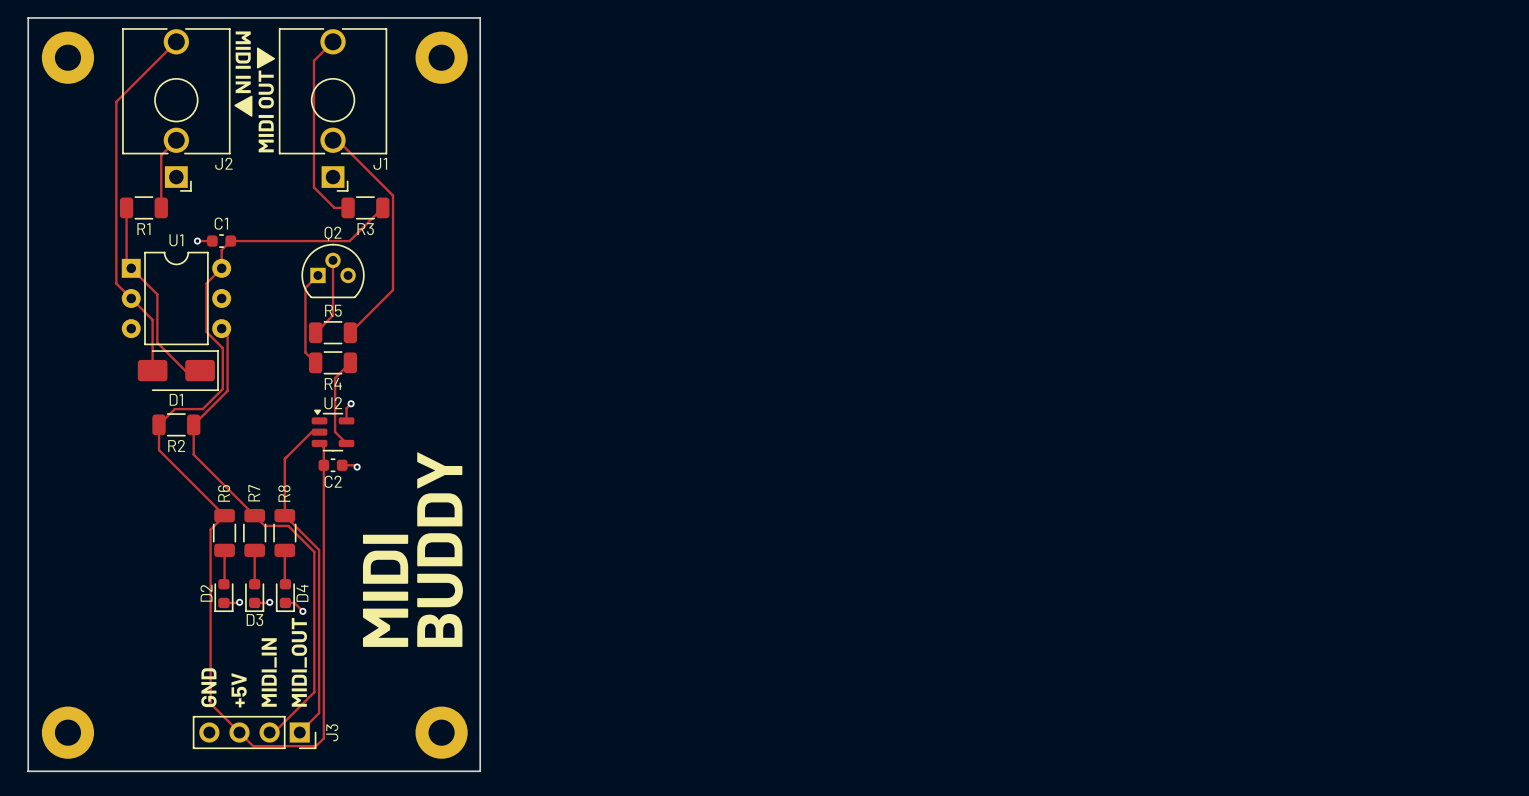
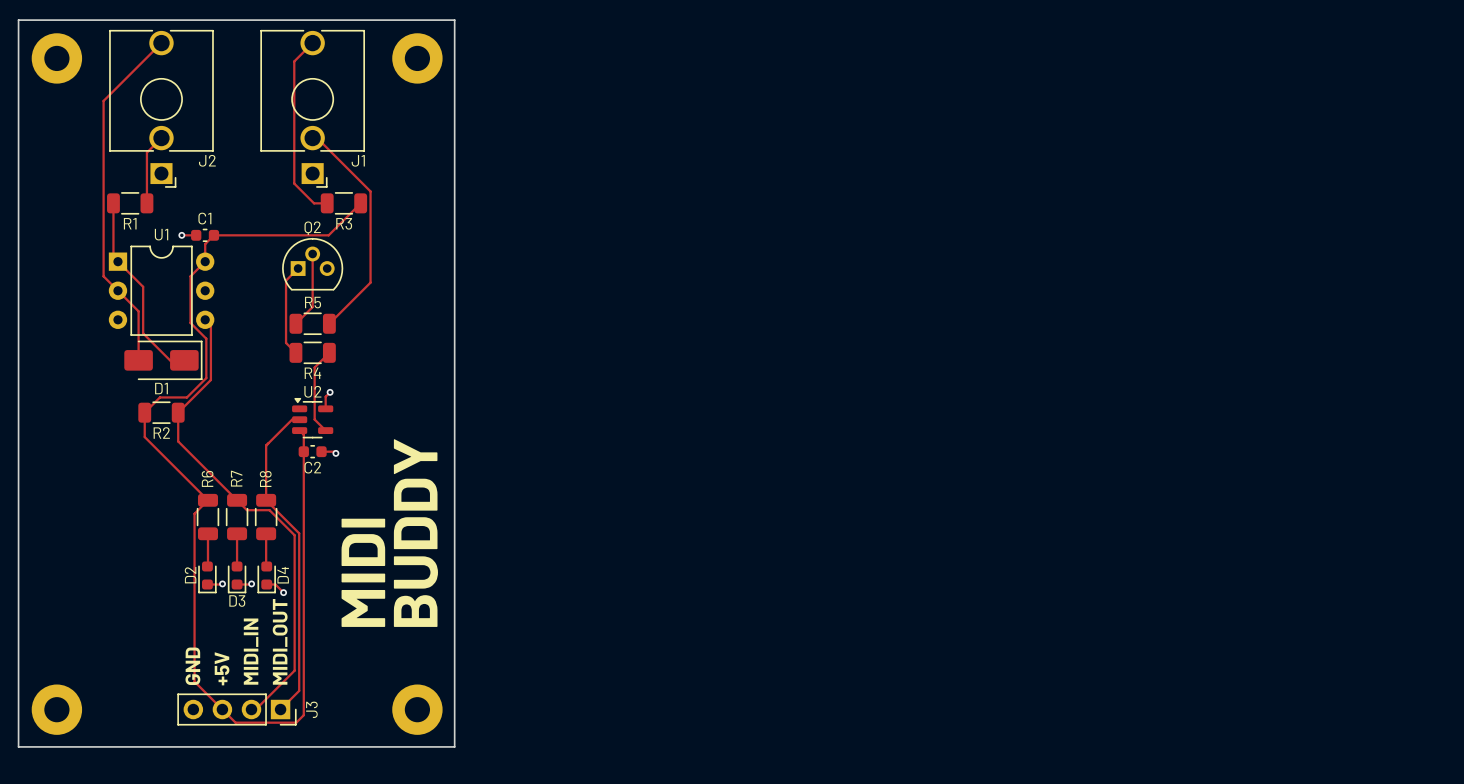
drawing: [256, 47, 276, 69] -> none
text: MIDI IN (243, 62) -> none
drawing: [234, 95, 253, 117] -> none
text: MIDI OUT (266, 111) -> none

